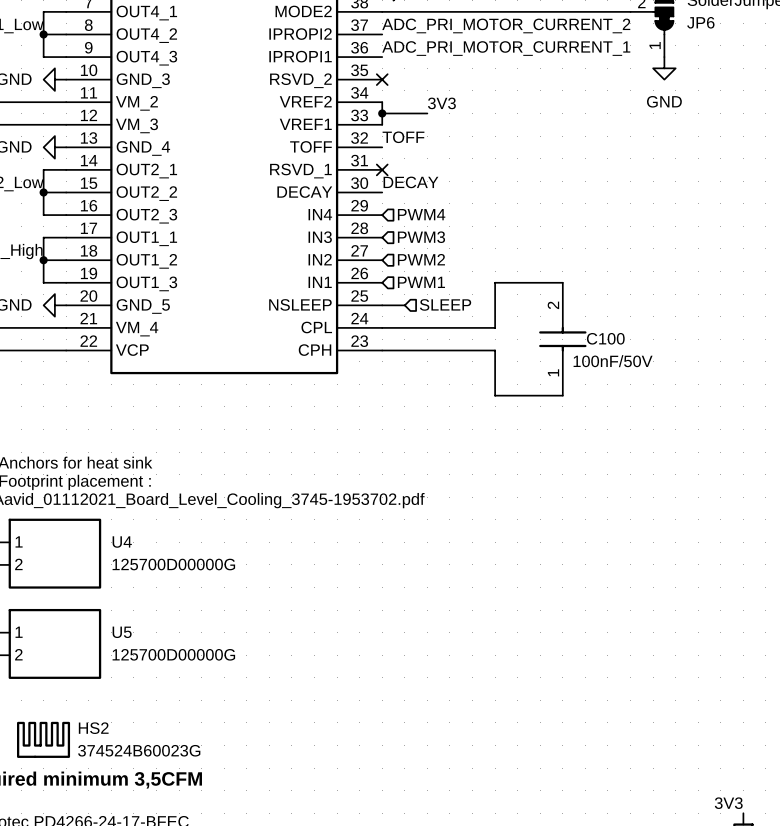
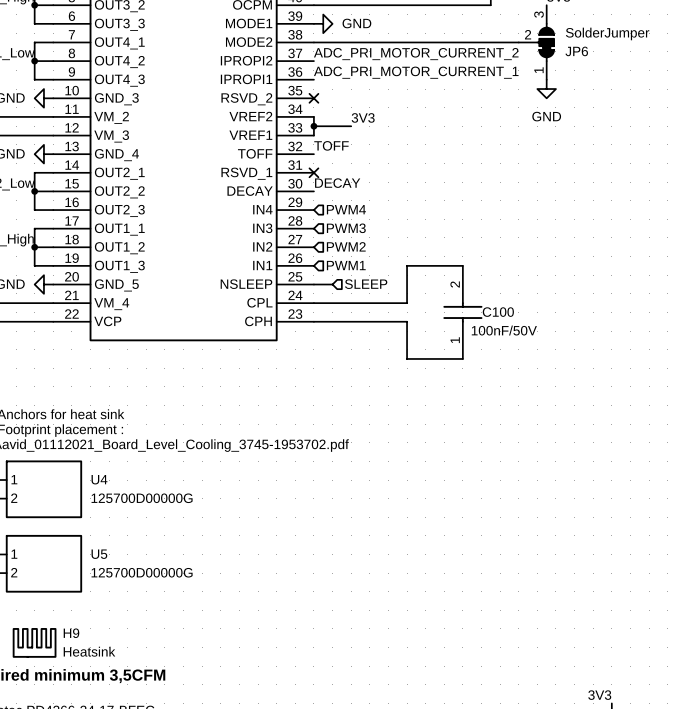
HS2 name: HS2 (93, 728) -> H9 (71, 633)
HS2 value: 374524B60023G (139, 750) -> Heatsink (89, 651)

